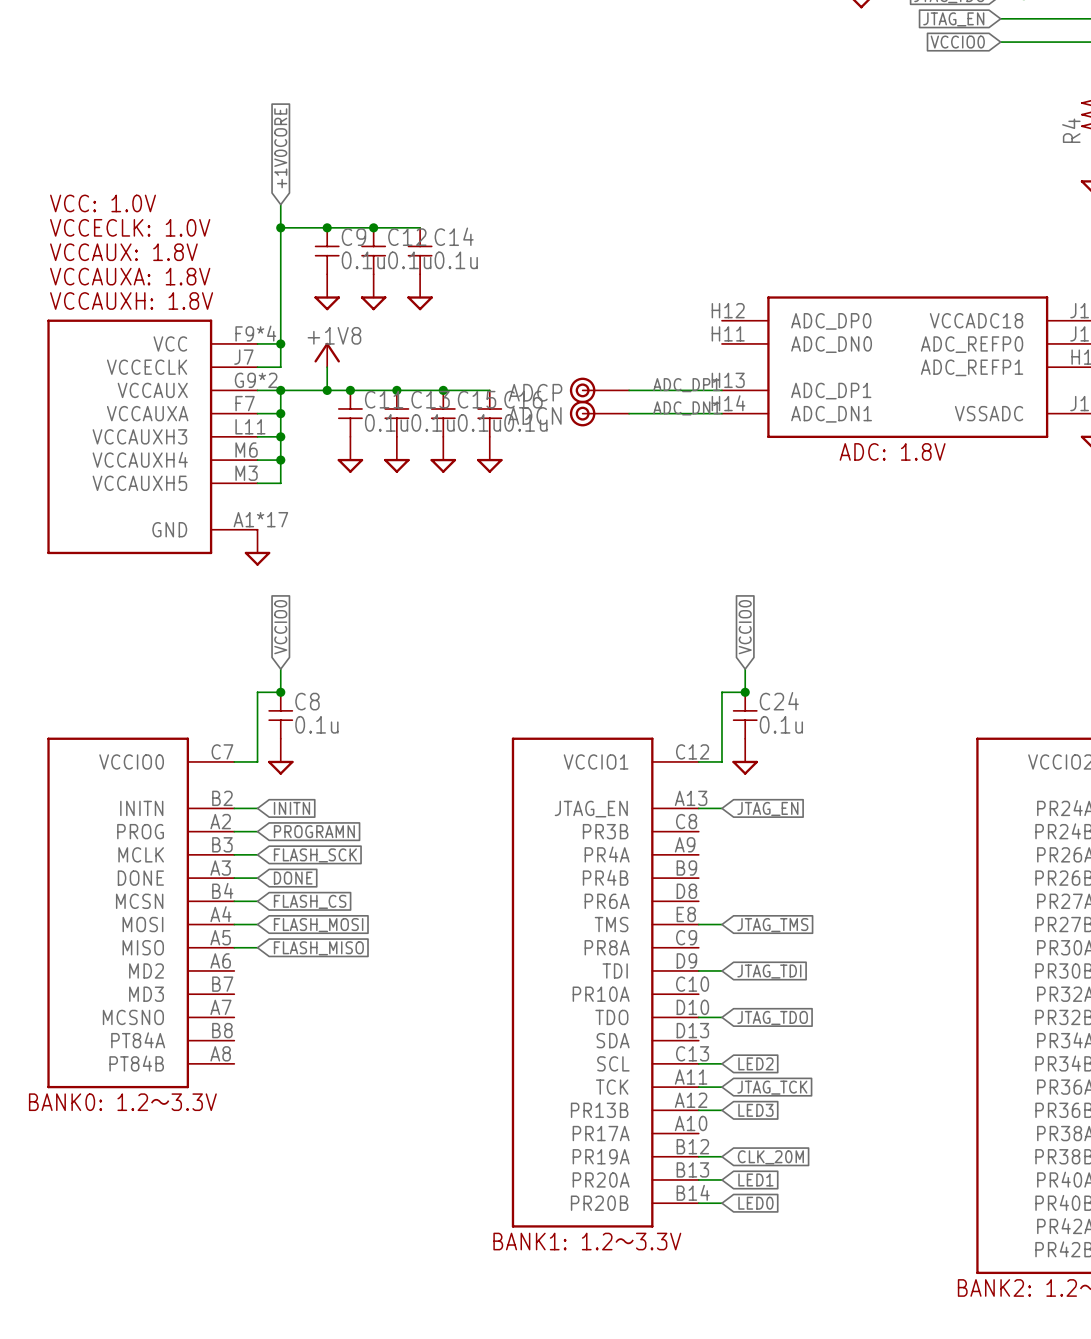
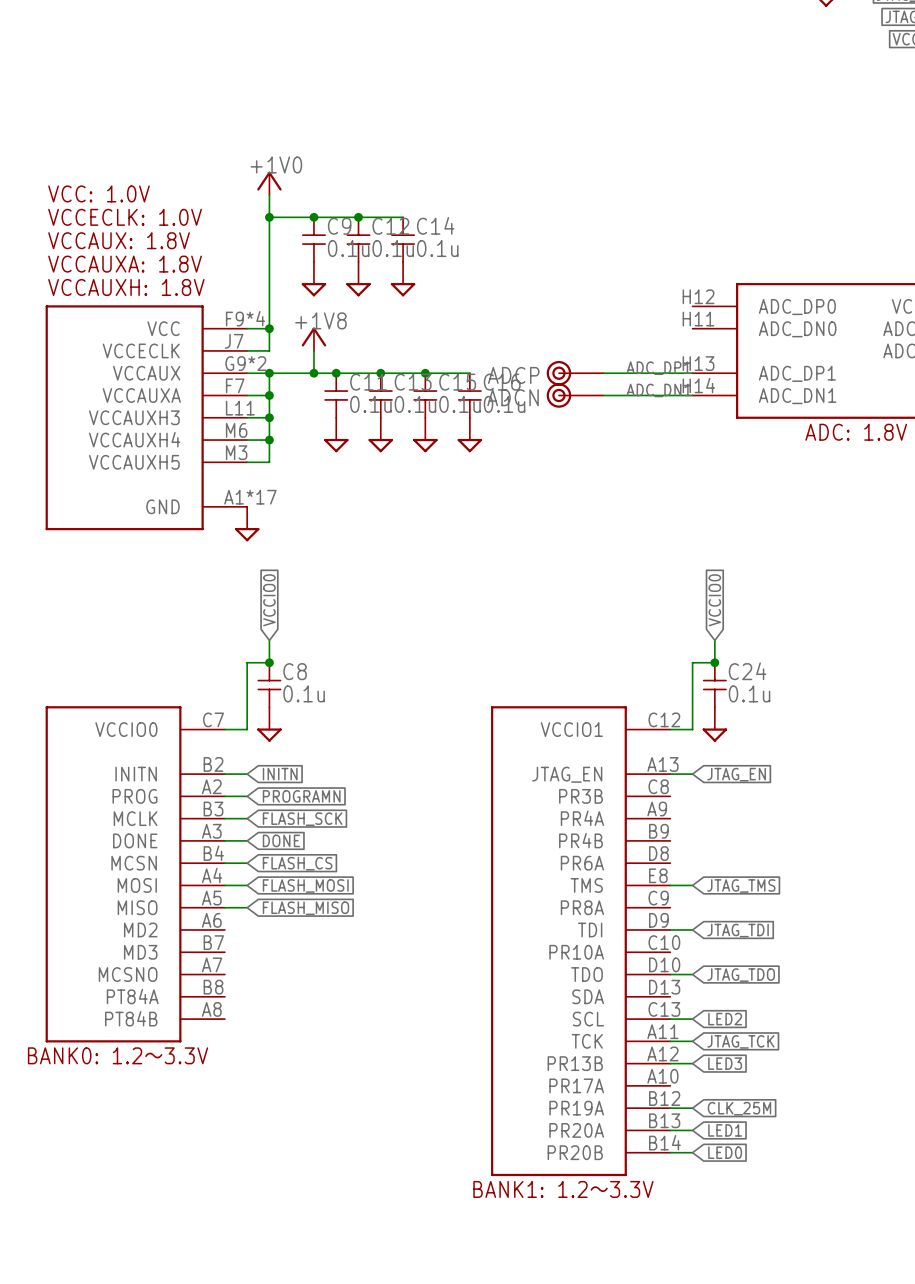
global label: +1V0CORE (280, 148) -> none
power symbol: none -> +1V0 (269, 183)
global label: CLK_20M (770, 1157) -> CLK_25M (739, 1108)

